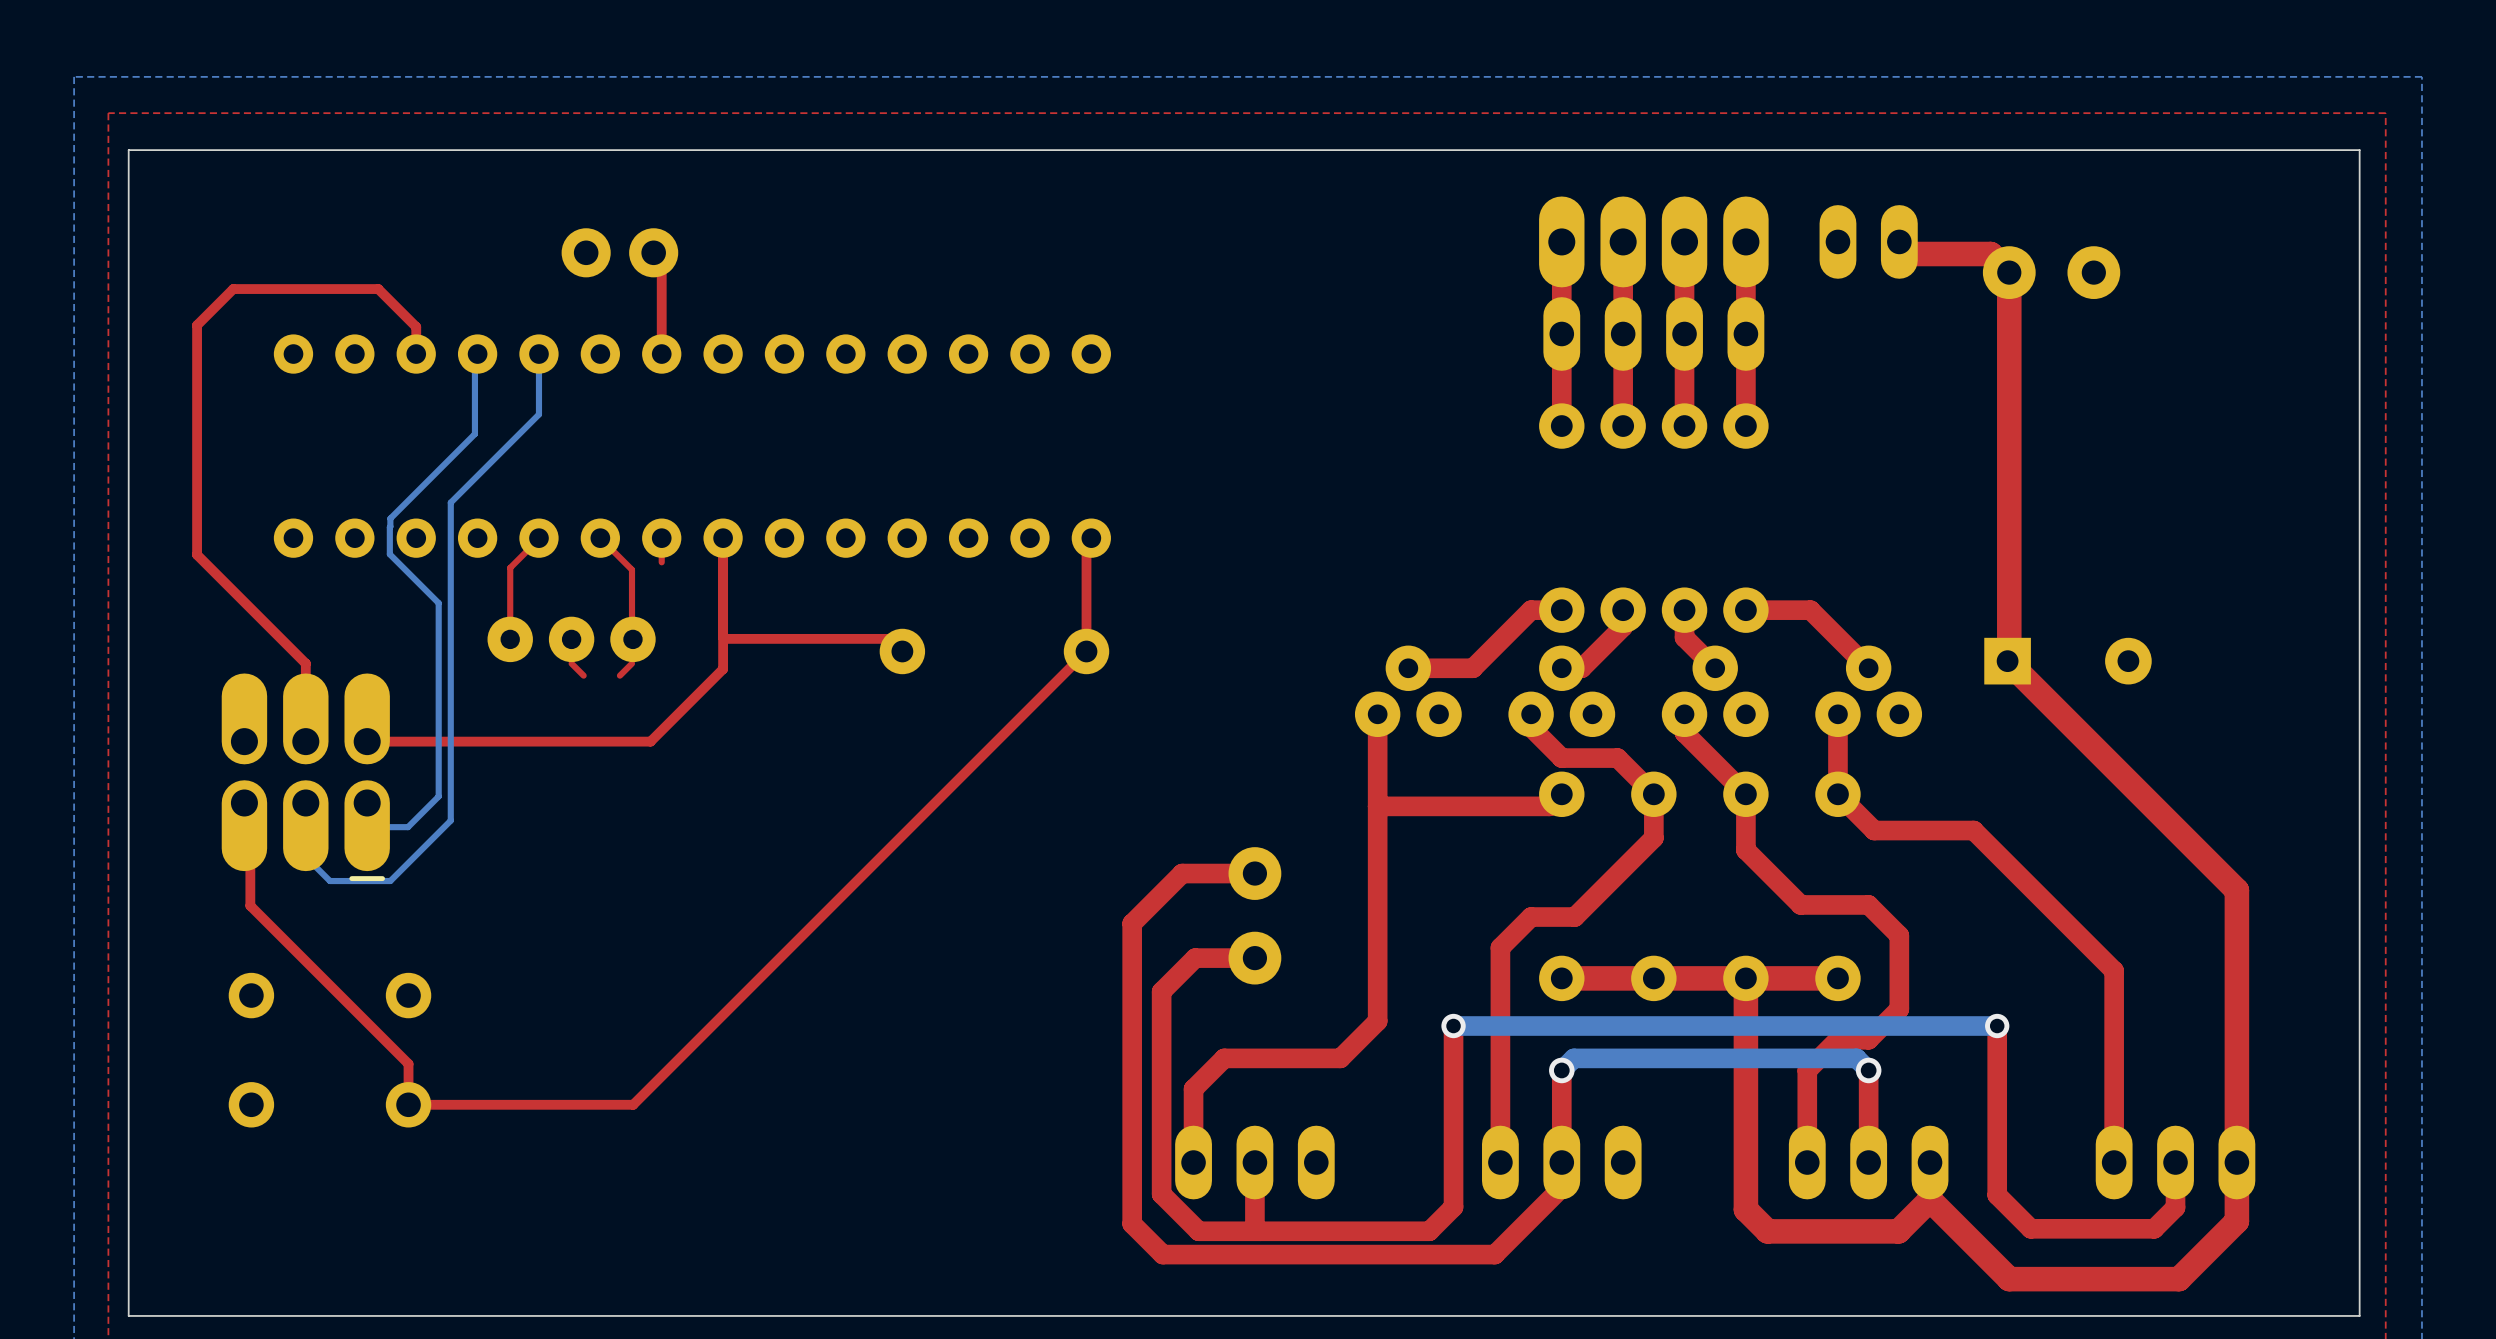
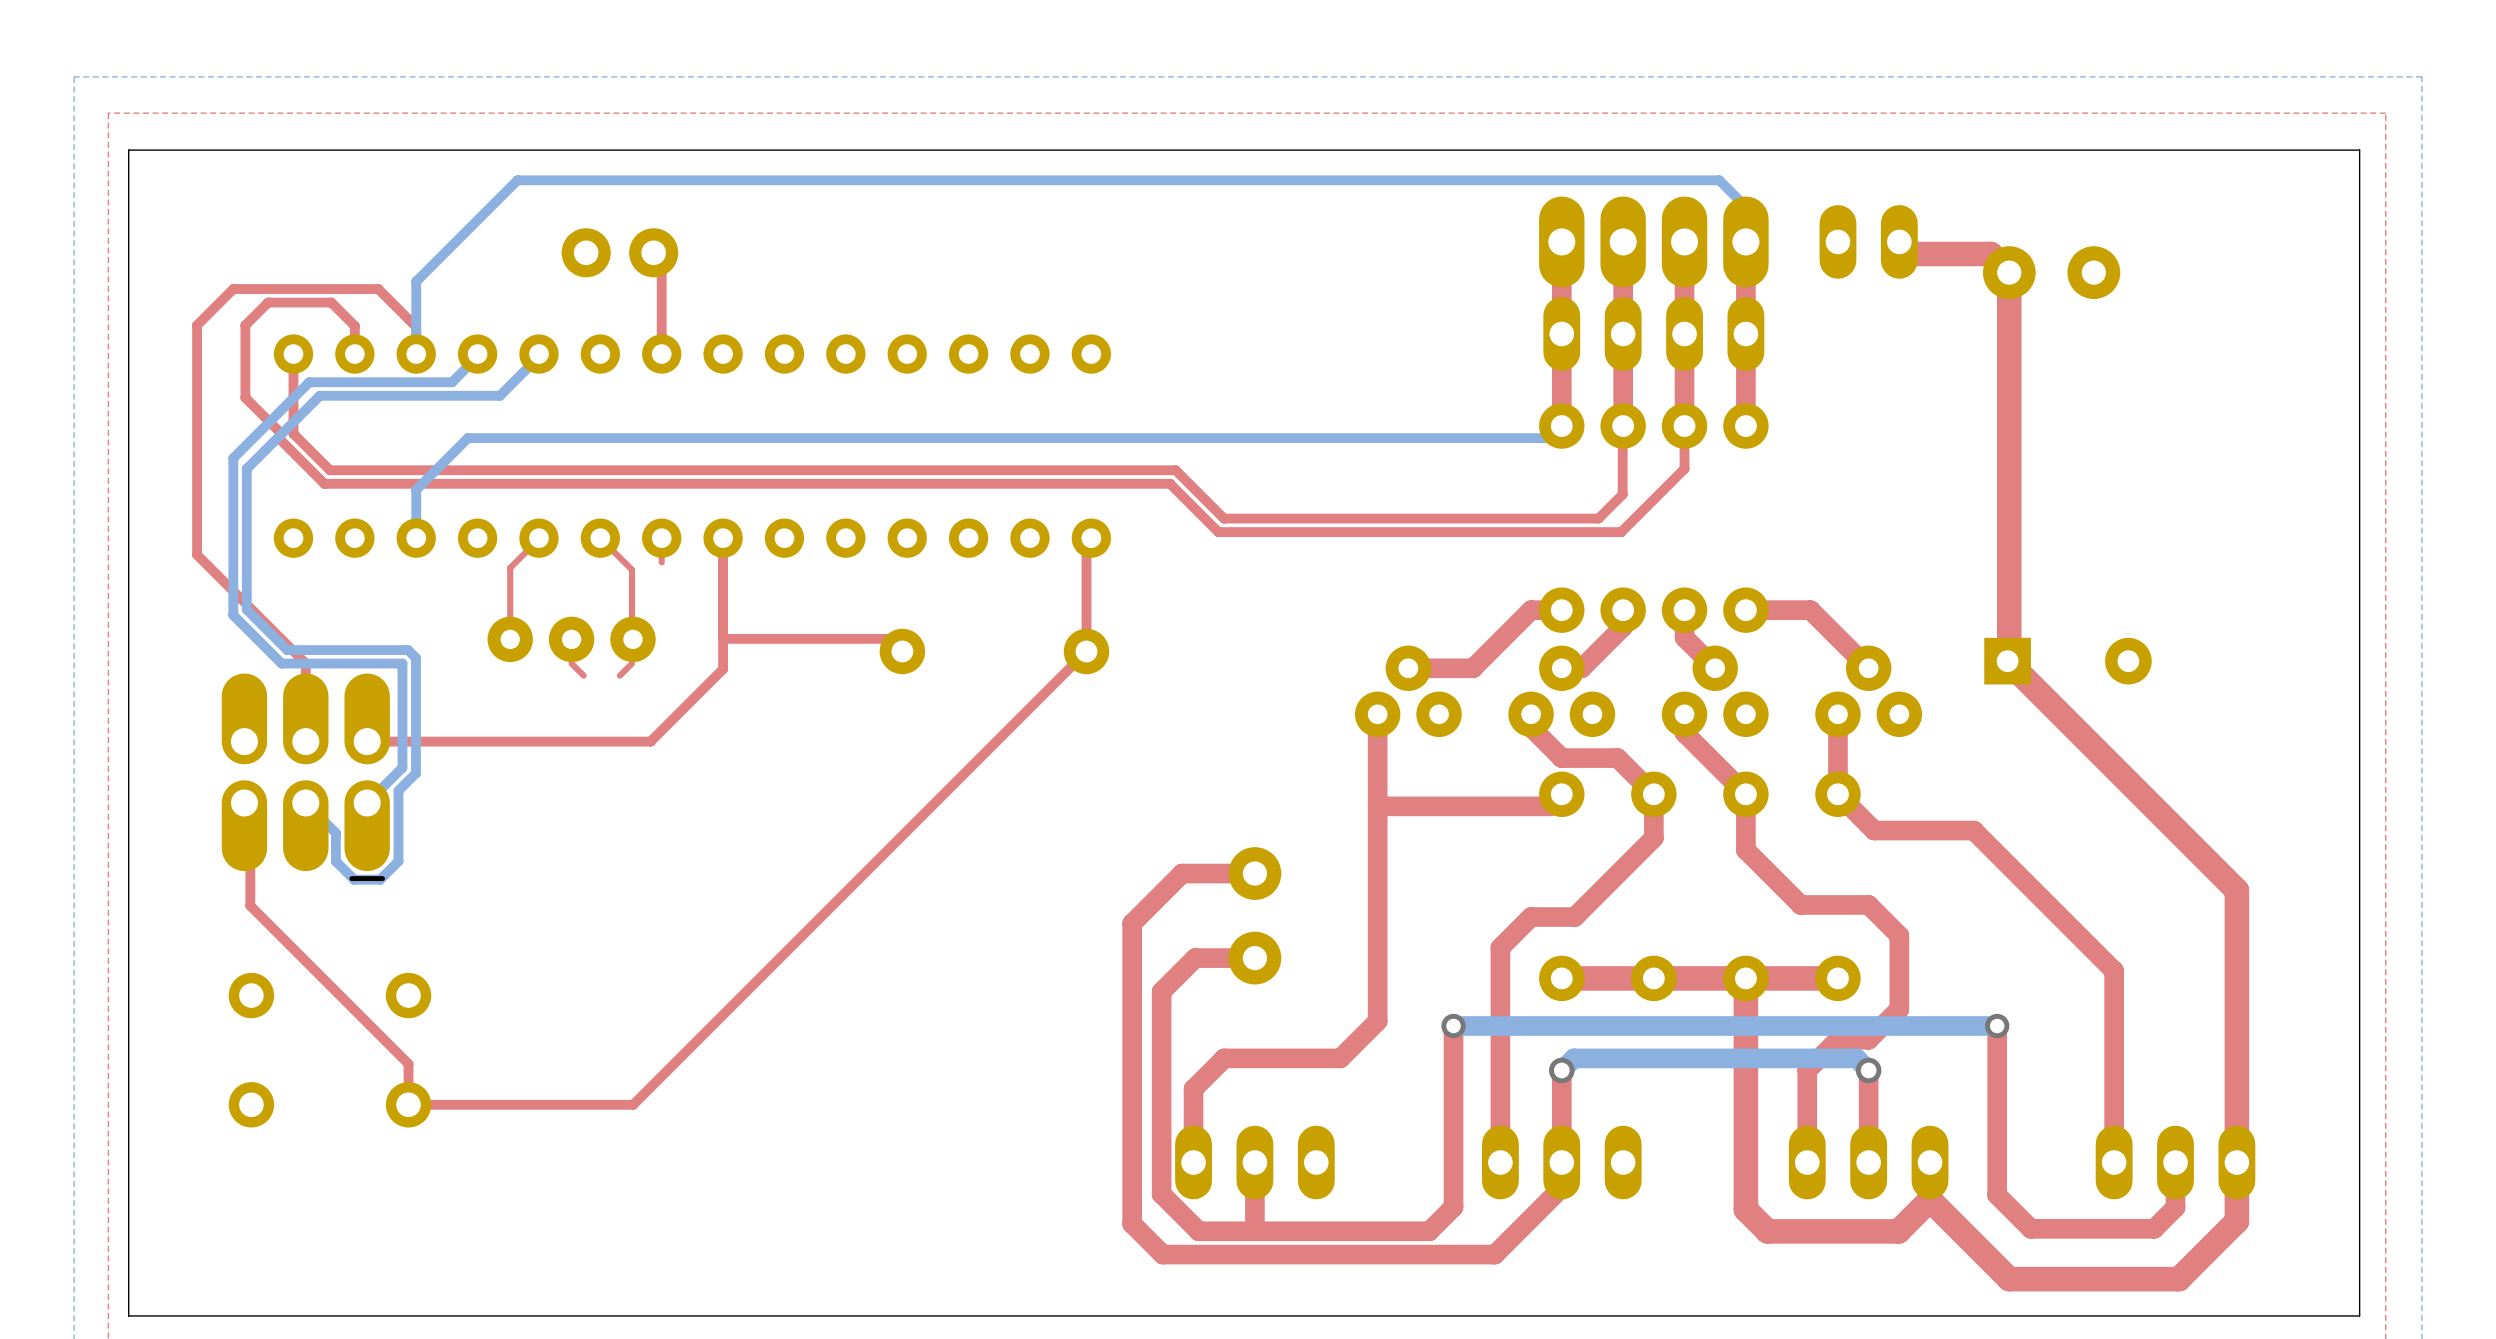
bottom track: none -> (1745, 241) (1745, 206) (1719, 180) (517, 180) (416, 281) (416, 354)
top track: none -> (293, 354) (293, 433) (329, 470) (1175, 470) (1223, 518) (1598, 518) (1622, 494) (1623, 426)
top track: none -> (354, 354) (354, 326) (331, 302) (268, 302) (245, 325) (245, 397) (279, 432) (279, 439) (324, 483) (1170, 483) (1218, 532) (1621, 532) (1684, 468) (1684, 426)
bottom track: (474, 356) (474, 434) (390, 518) (389, 554) (438, 603) (438, 796) (408, 827) (367, 827) (367, 802) -> (477, 354) (477, 356) (452, 382) (309, 382) (233, 458) (233, 615) (281, 663) (402, 663) (402, 767) (367, 802)
bottom track: (538, 356) (538, 414) (450, 502) (450, 820) (390, 881) (329, 881) (305, 856) (305, 802) -> (538, 356) (499, 395) (319, 395) (246, 468) (246, 609) (287, 650) (408, 650) (415, 657) (415, 773) (398, 790) (398, 861) (380, 879) (354, 879) (335, 861) (335, 833) (305, 802)
bottom track: none -> (1561, 426) (1549, 438) (467, 438) (416, 489) (416, 538)

